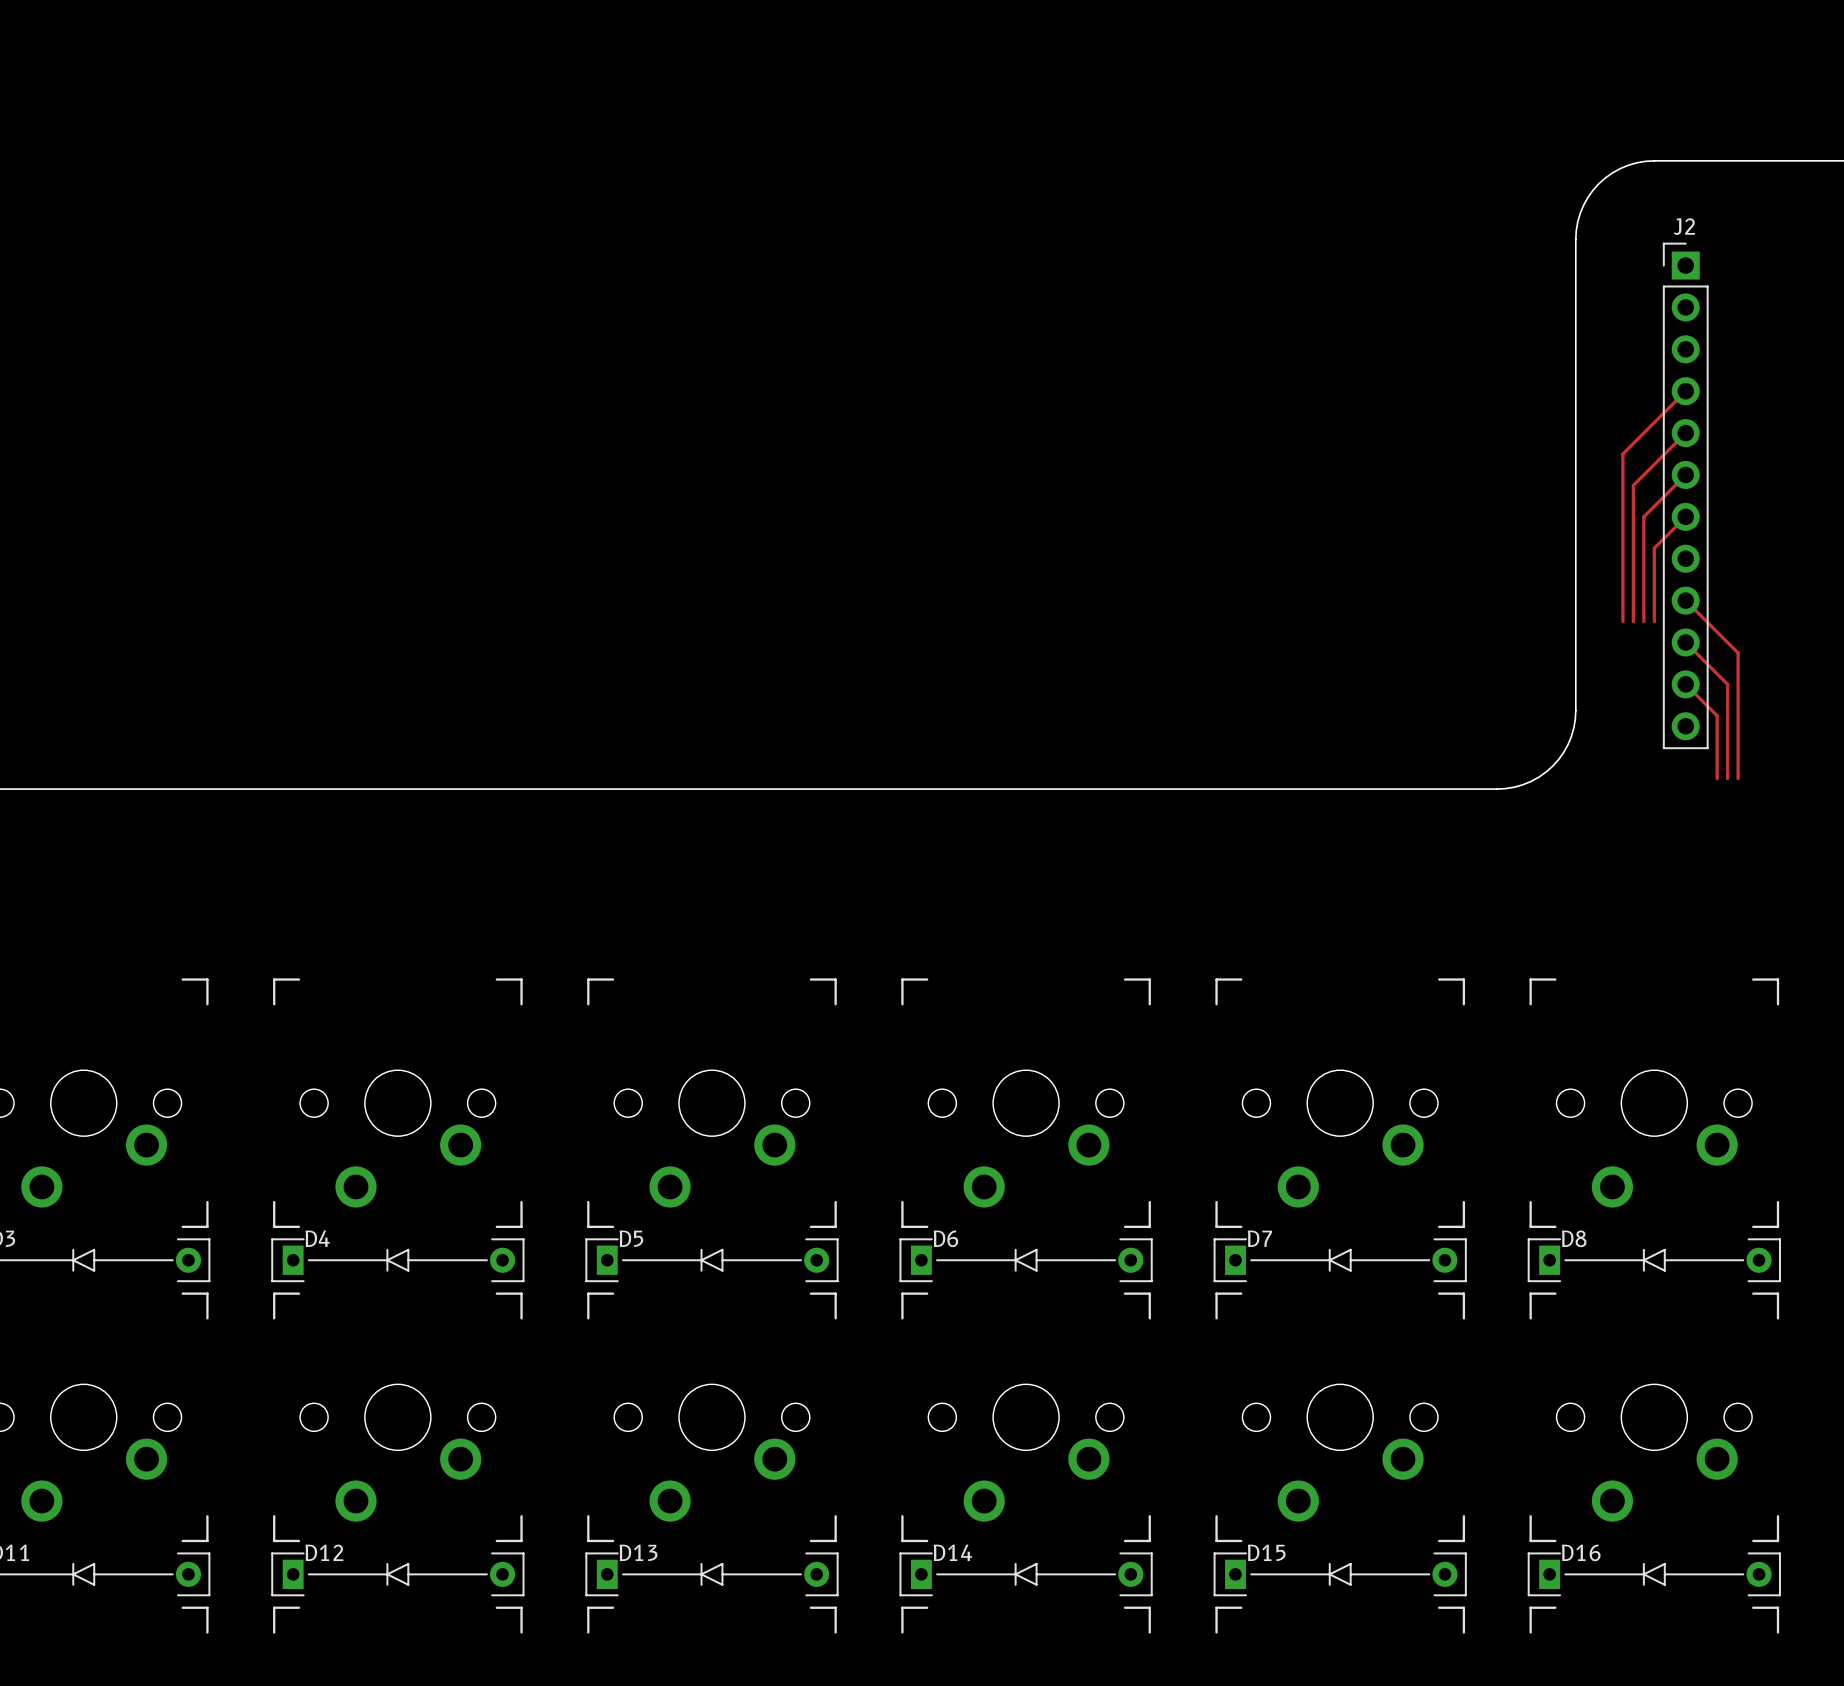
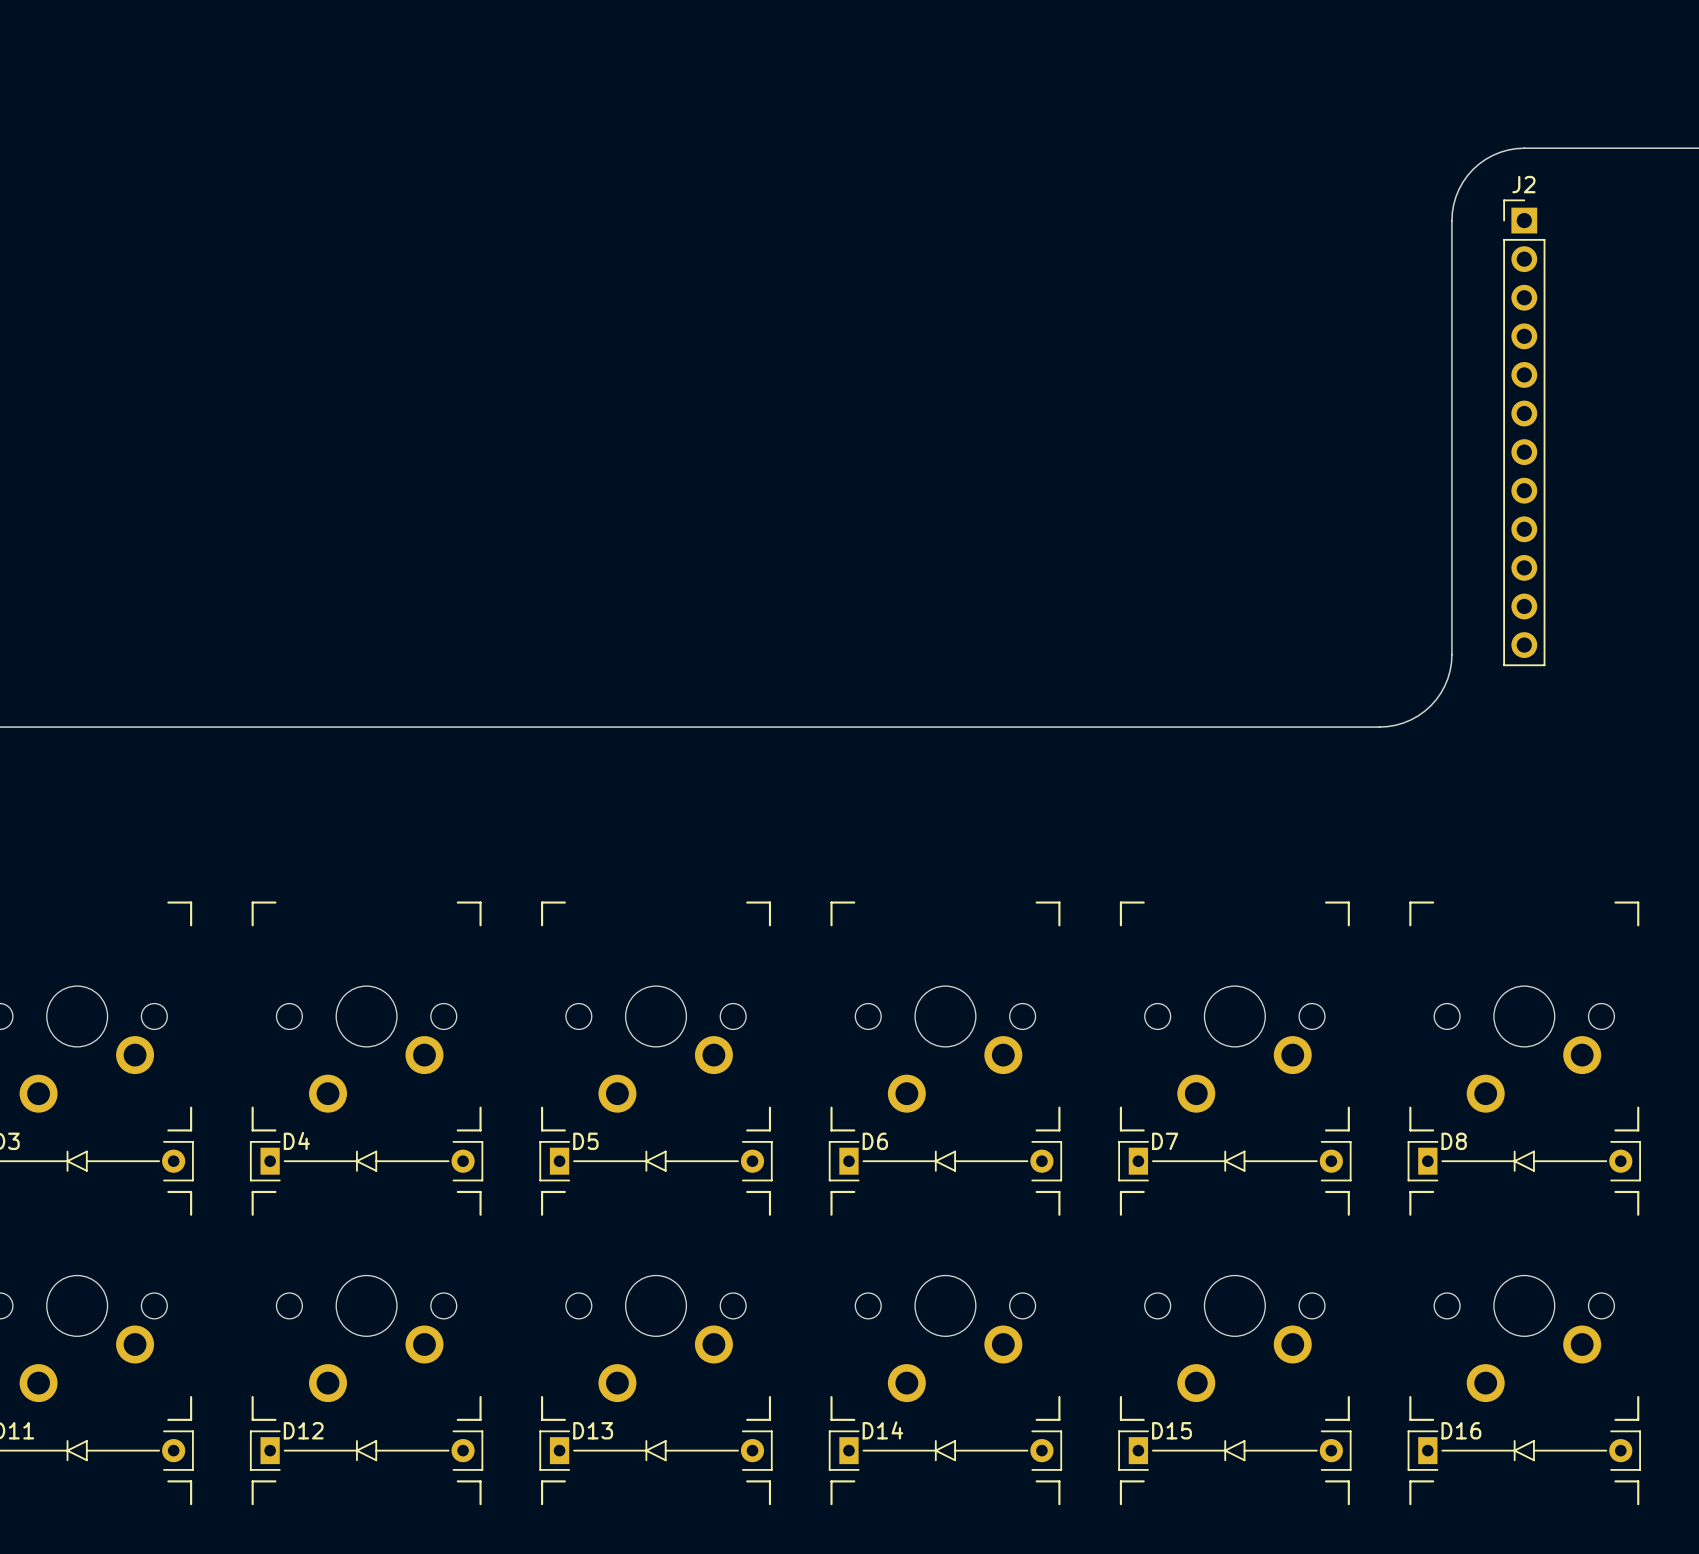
track: (1685, 391) (1622, 454) (1622, 621) -> none
track: (1685, 433) (1633, 485) (1633, 621) -> none
track: (1685, 474) (1643, 516) (1643, 621) -> none
J2 position: (1685, 495) -> (1524, 432)
track: (1685, 516) (1654, 548) (1654, 621) -> none
track: (1685, 600) (1738, 652) (1738, 778) -> none
track: (1685, 642) (1727, 684) (1727, 778) -> none
track: (1685, 684) (1717, 715) (1717, 778) -> none

